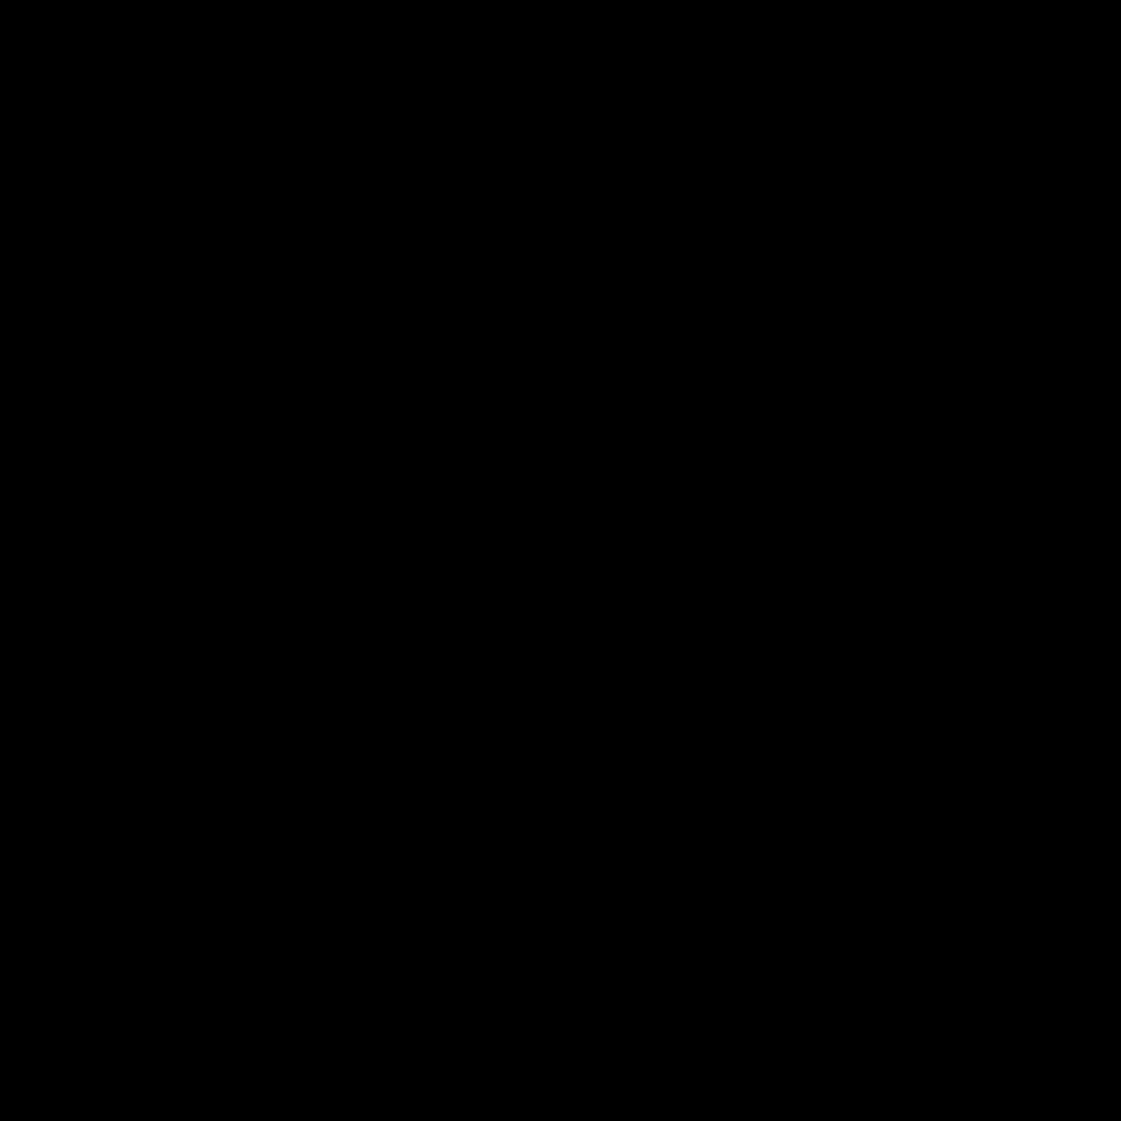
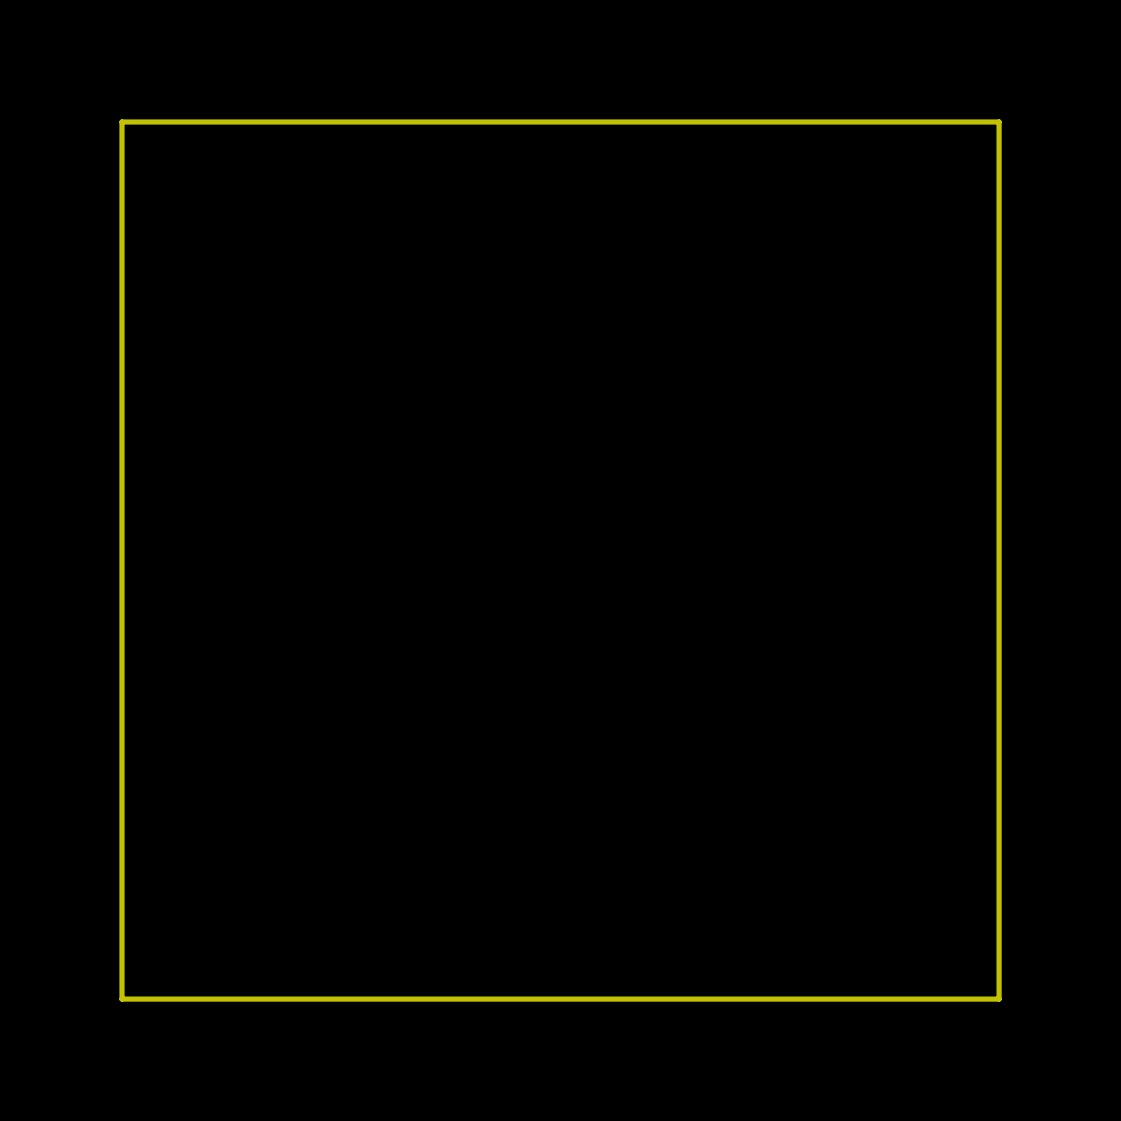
board edge: none -> (999, 121) (999, 999) (121, 999) (121, 121) (999, 121)

